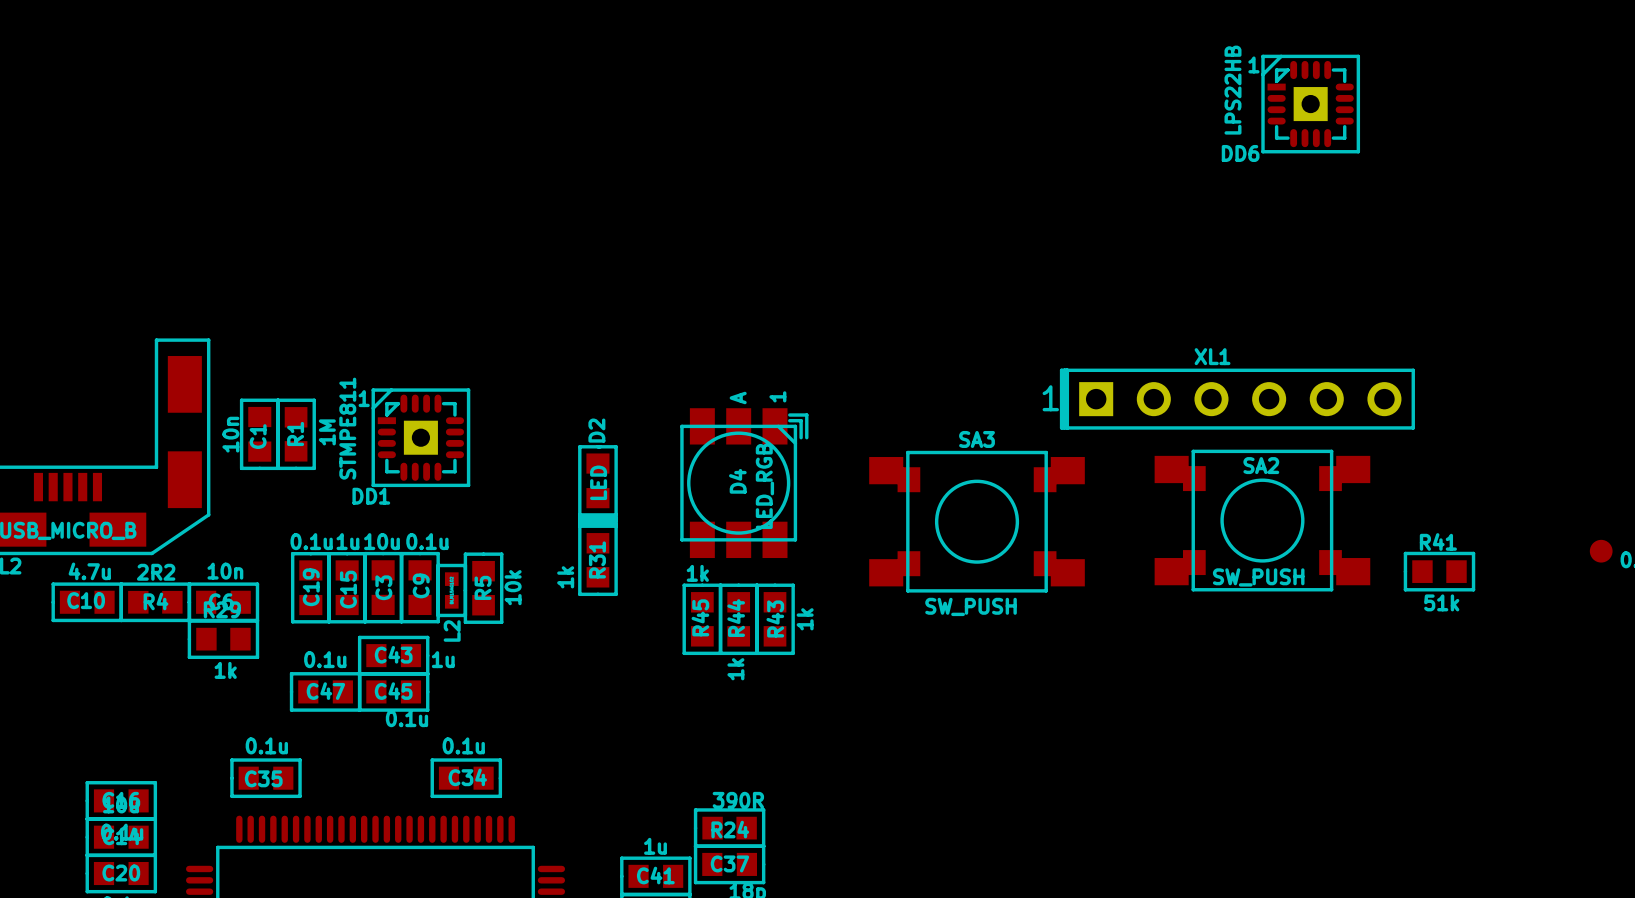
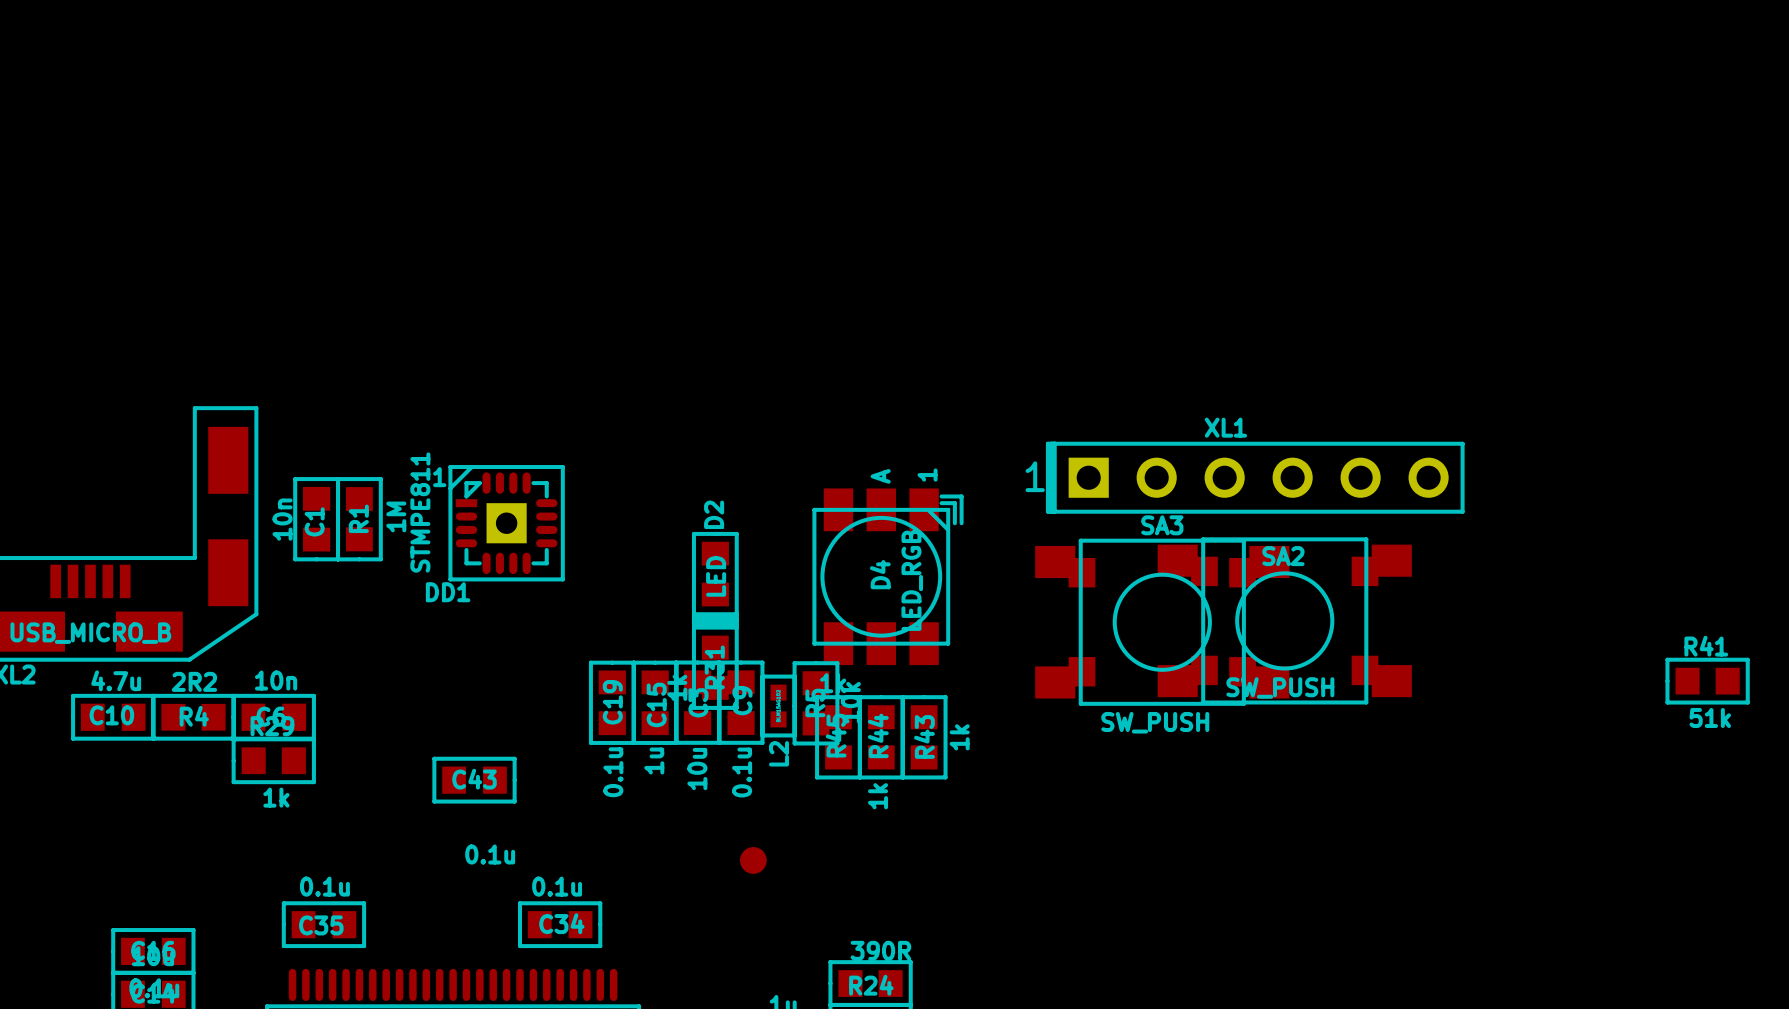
DD6: LPS22HB (1310, 104) -> none
XL1 position: (1237, 399) -> (1255, 477)
SA2 position: (1262, 520) -> (1284, 620)
C19 value rotation: 0° (311, 541) -> 90° counterclockwise (613, 772)
C19 value position: 0.1u (311, 541) -> 0.1u (613, 772)
C15 value rotation: 0° (347, 541) -> 90° counterclockwise (654, 761)
C15 value position: 1u (347, 541) -> 1u (654, 761)
C3 value rotation: 0° (382, 541) -> 90° counterclockwise (697, 769)
C3 value position: 10u (382, 541) -> 10u (697, 769)
C9 value rotation: 0° (427, 541) -> 90° counterclockwise (742, 772)
C9 value position: 0.1u (427, 541) -> 0.1u (742, 772)
C19 position: (310, 587) -> (612, 702)
C15 position: (347, 587) -> (655, 702)
C3 position: (383, 587) -> (697, 702)
C9 position: (420, 587) -> (741, 702)
R5 position: (483, 588) -> (816, 703)
L2 position: (451, 590) -> (778, 706)
C47: 0.1u (325, 691) -> none
C45: 1u (393, 691) -> none
part: none -> (753, 860)

